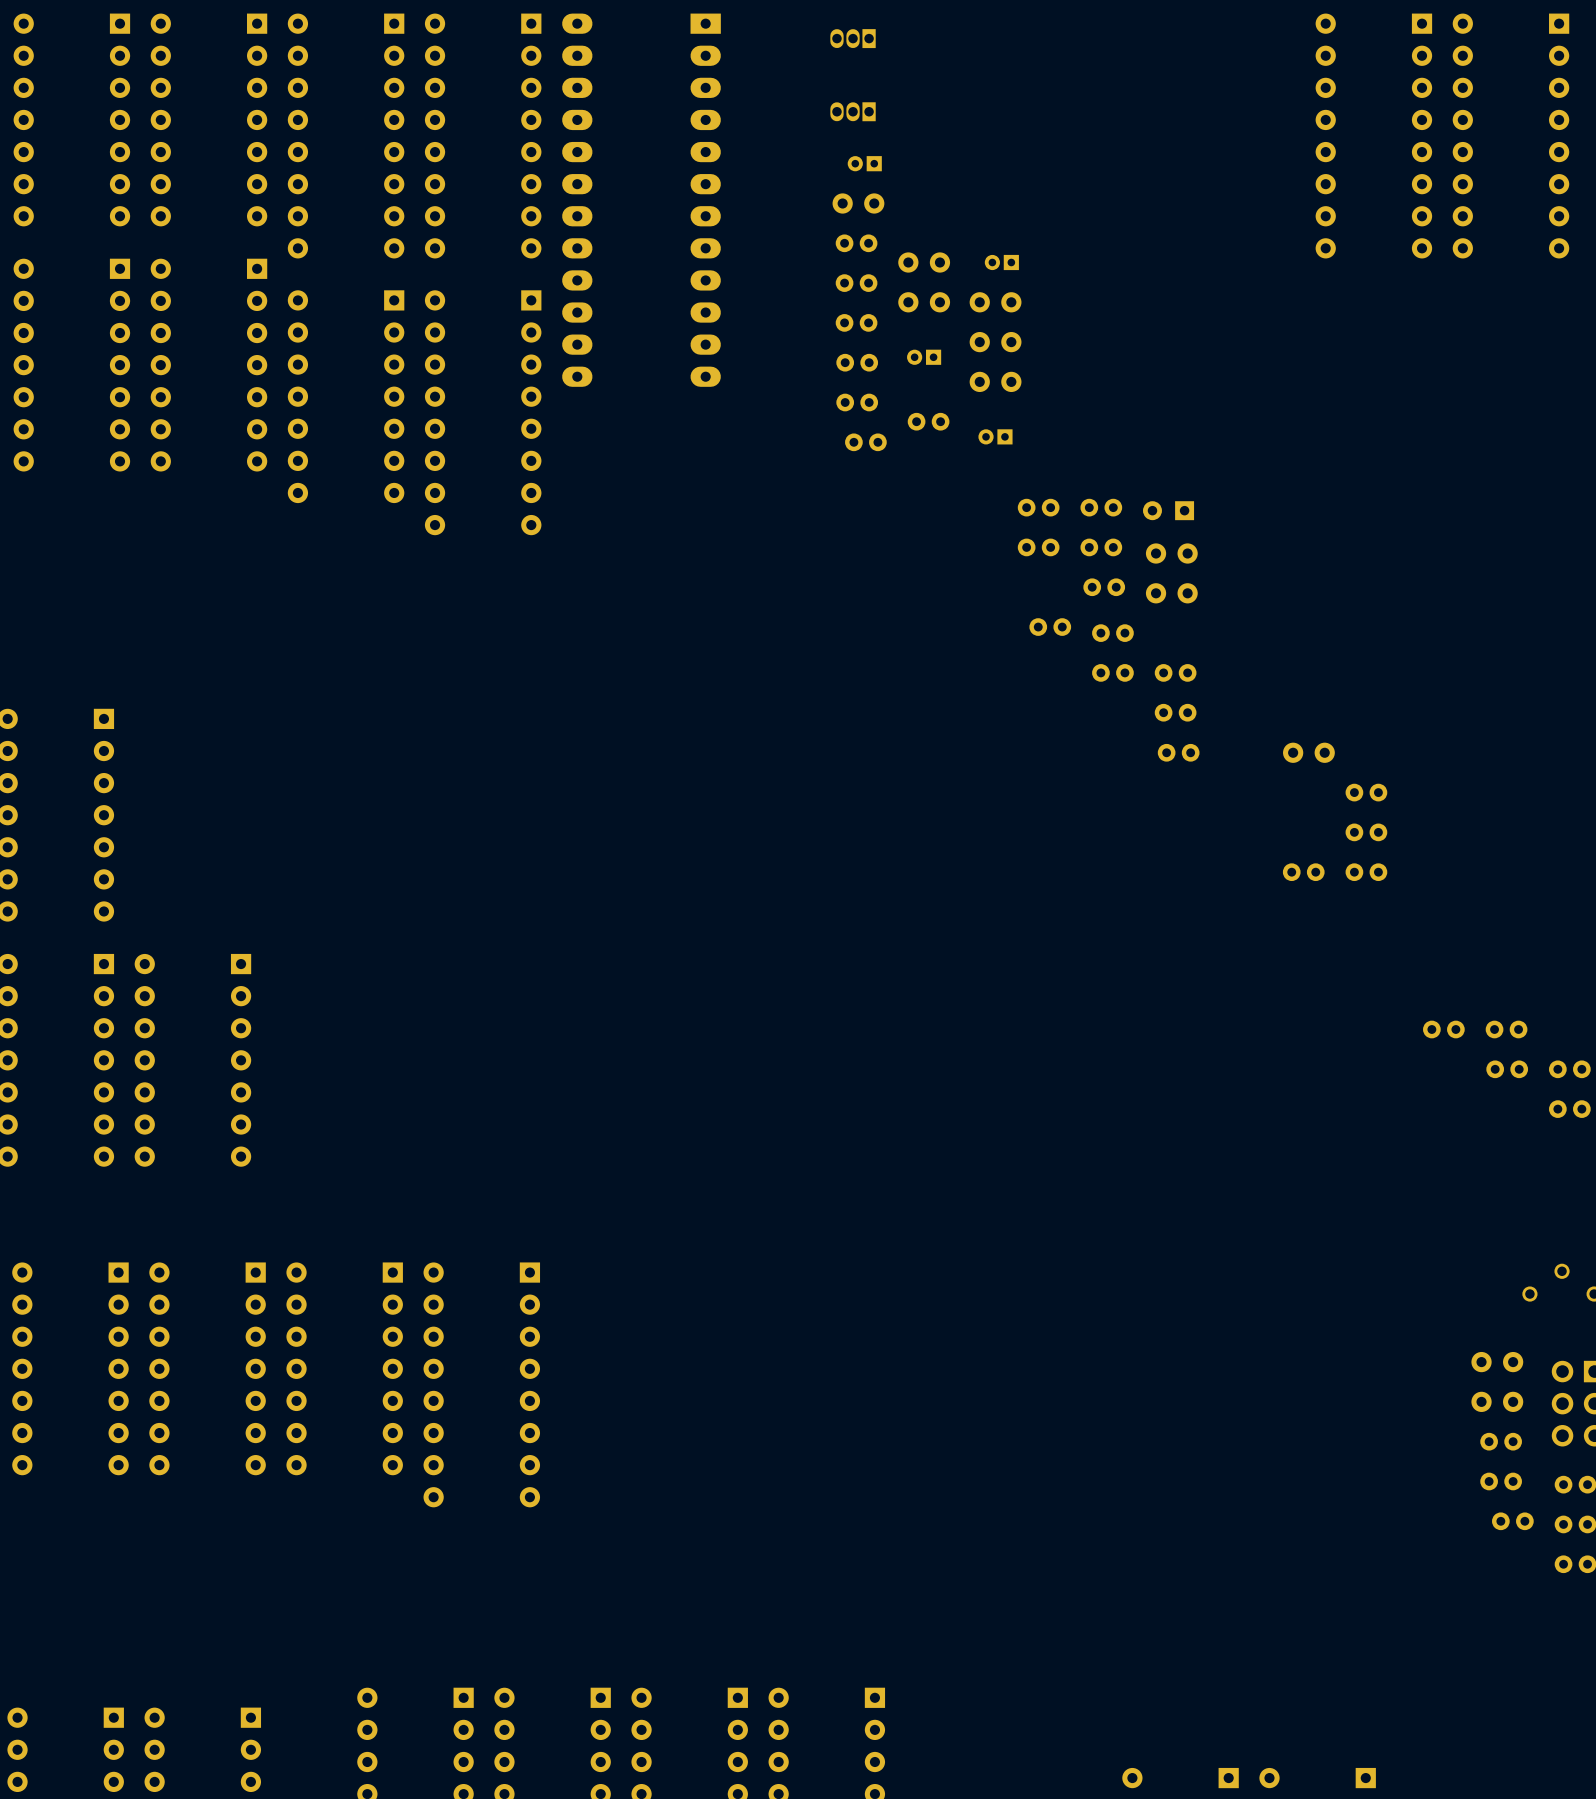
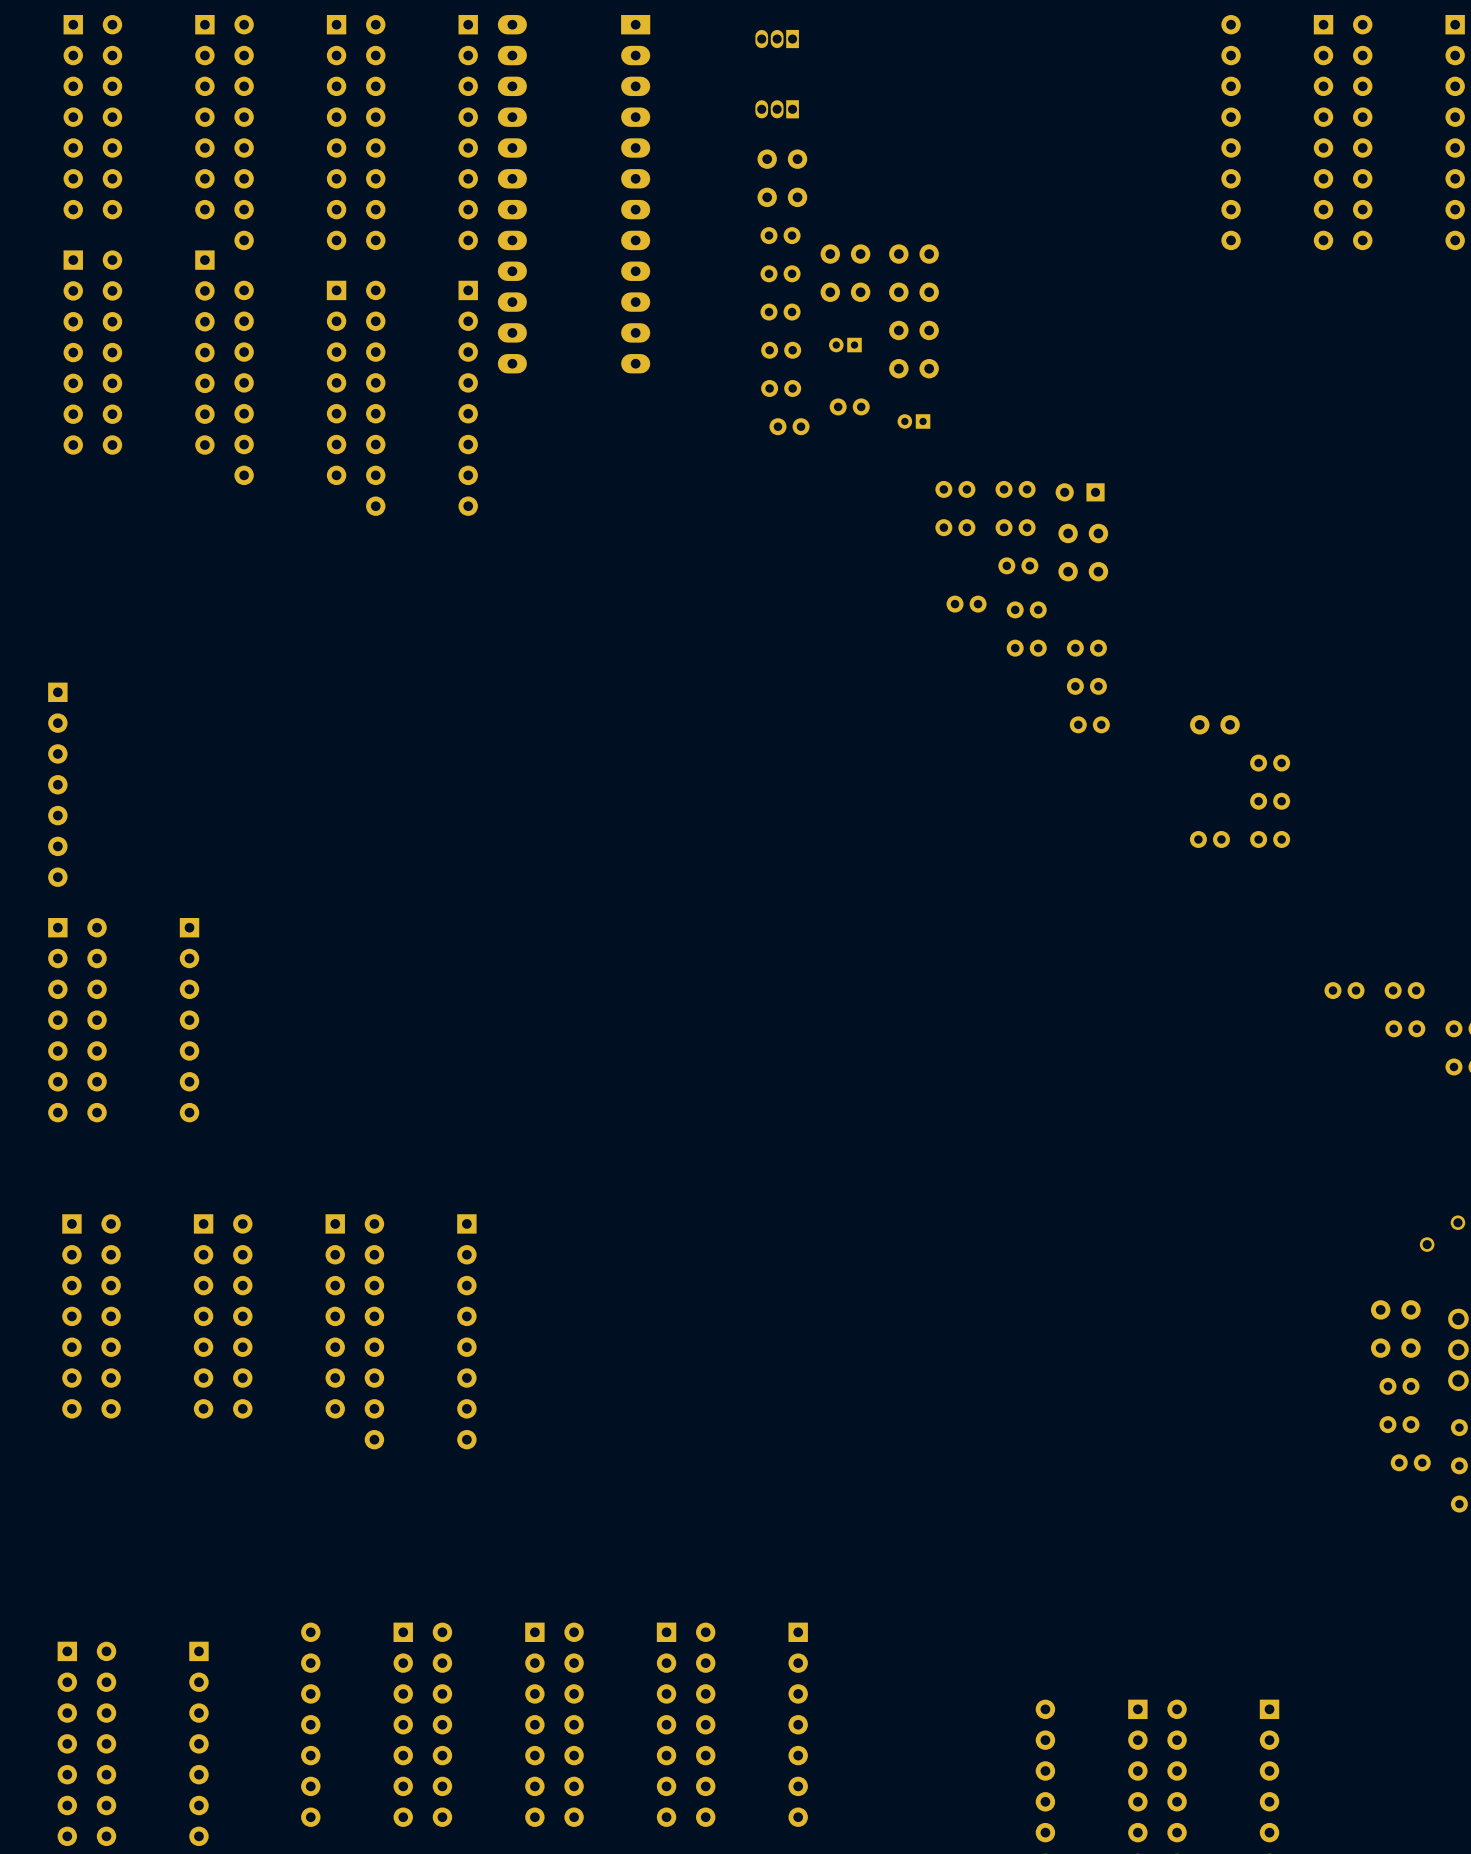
part footprint: [847, 156, 882, 172] -> [757, 149, 808, 169]
part footprint: [984, 254, 1019, 271] -> [889, 244, 939, 264]

